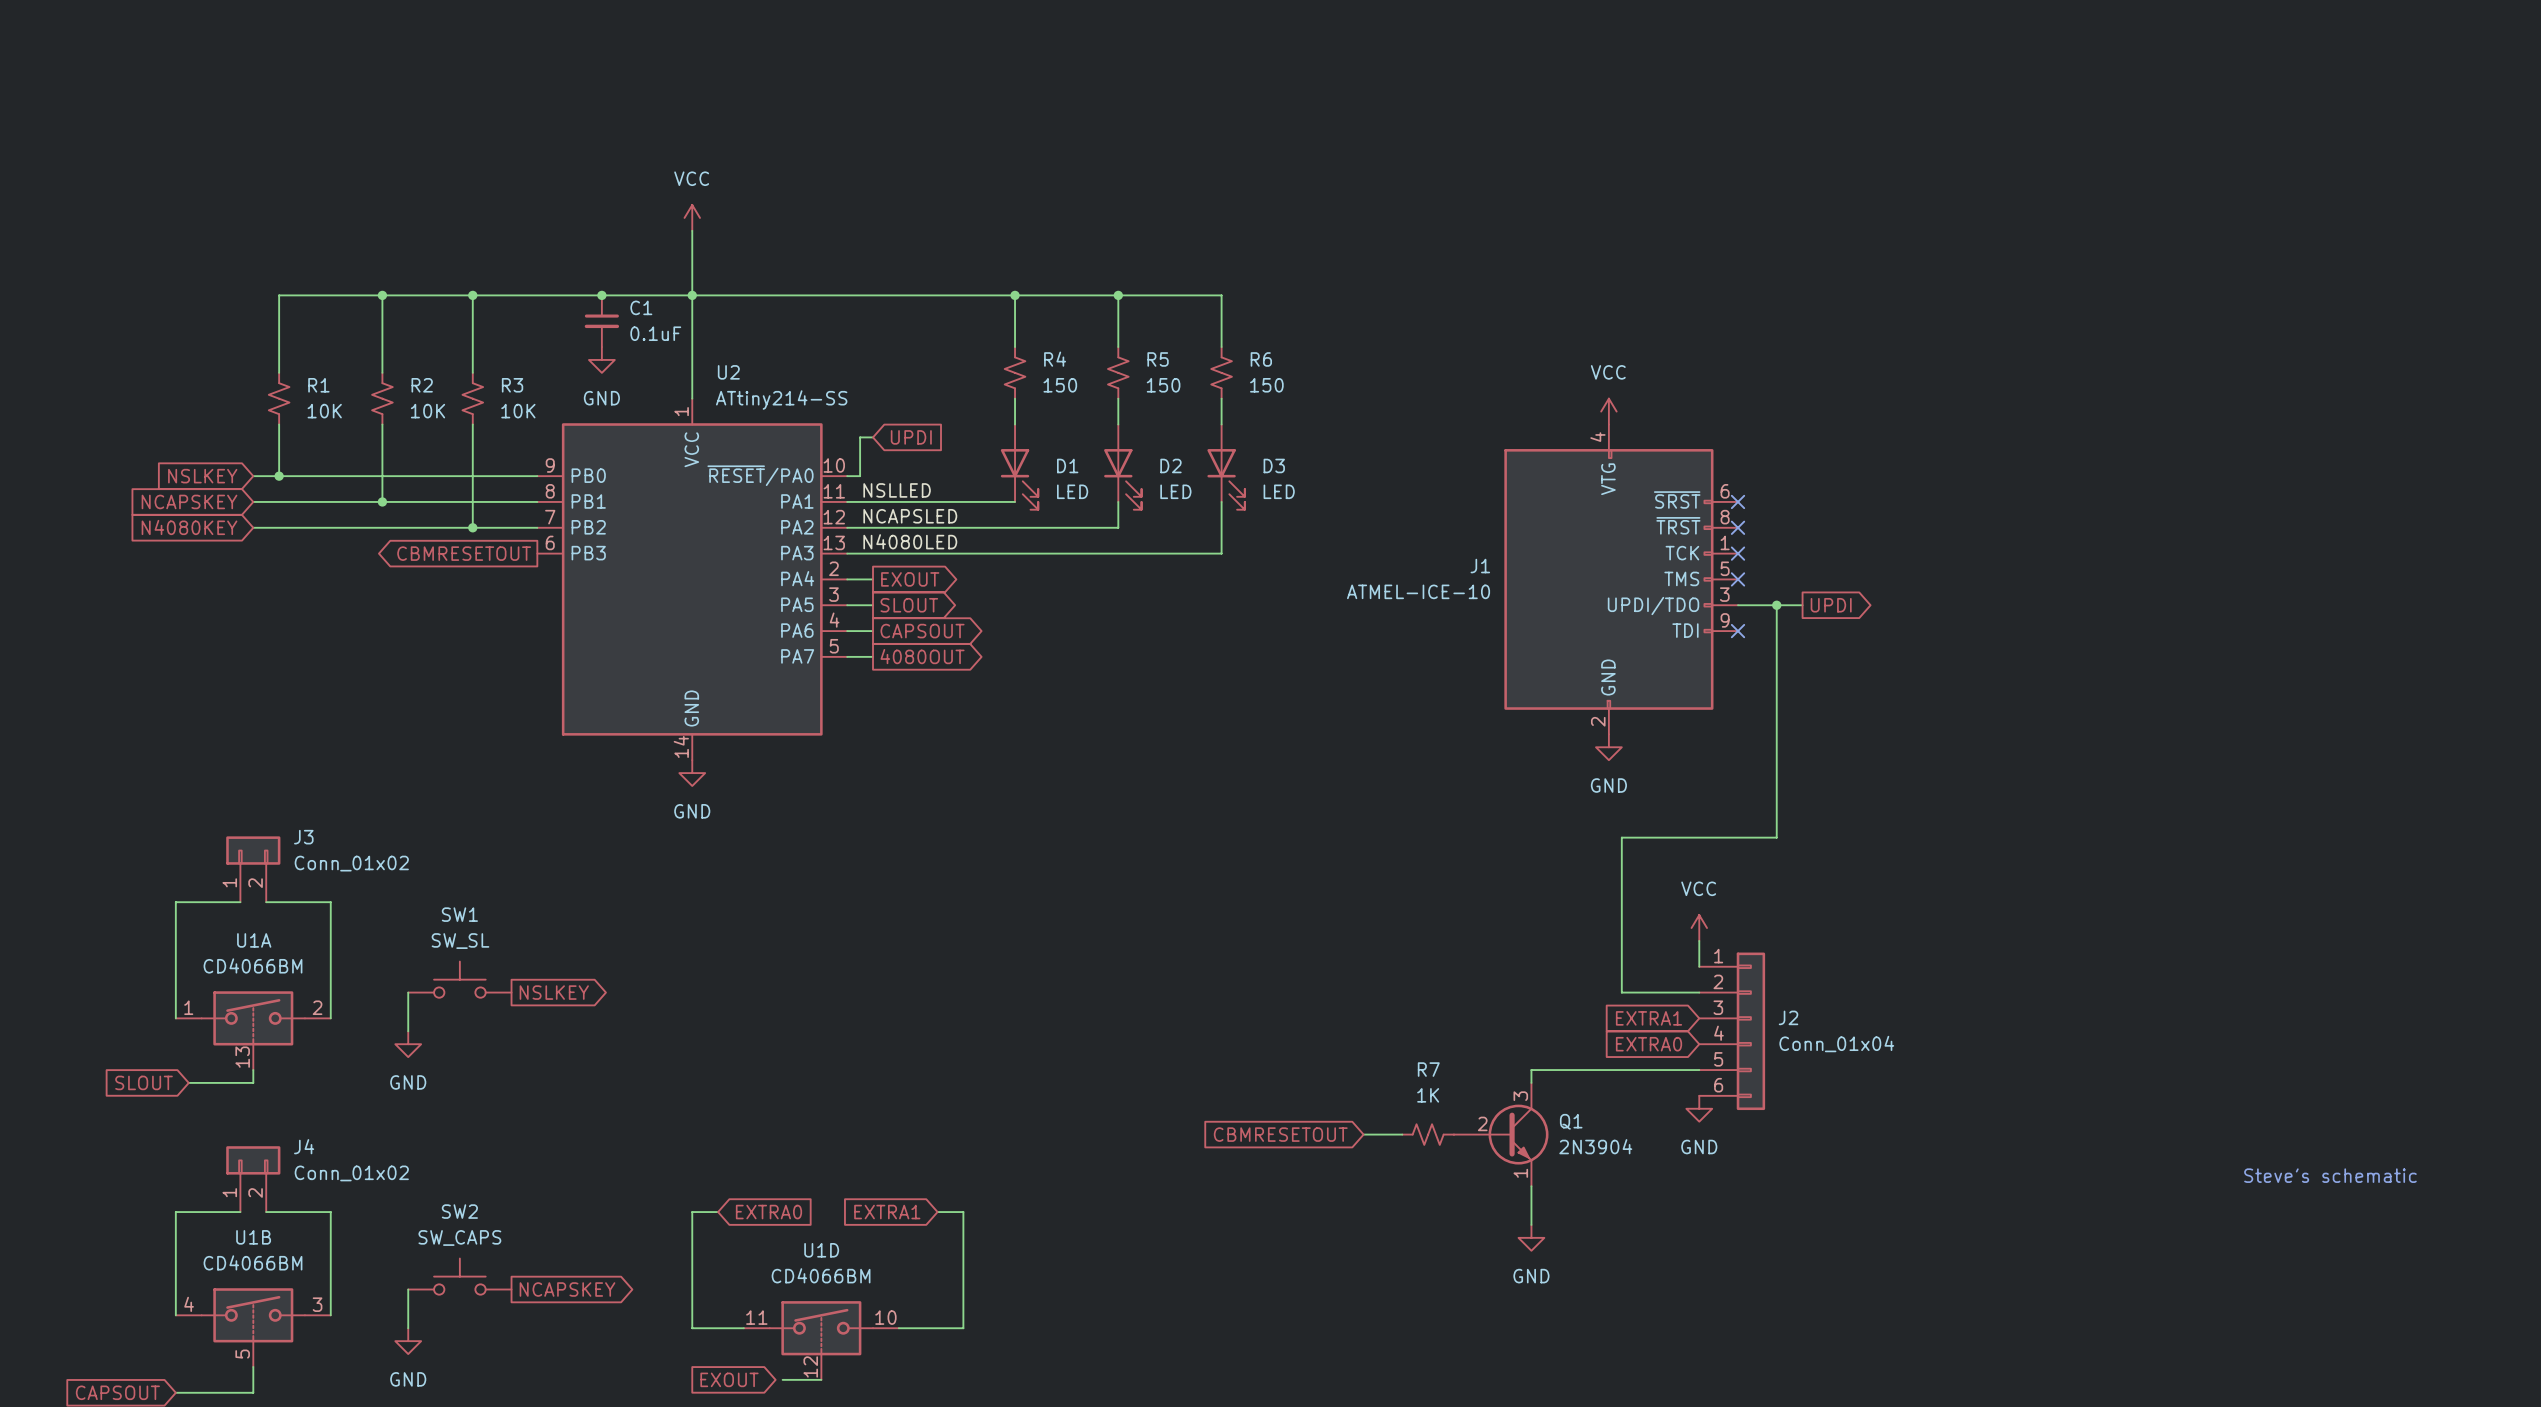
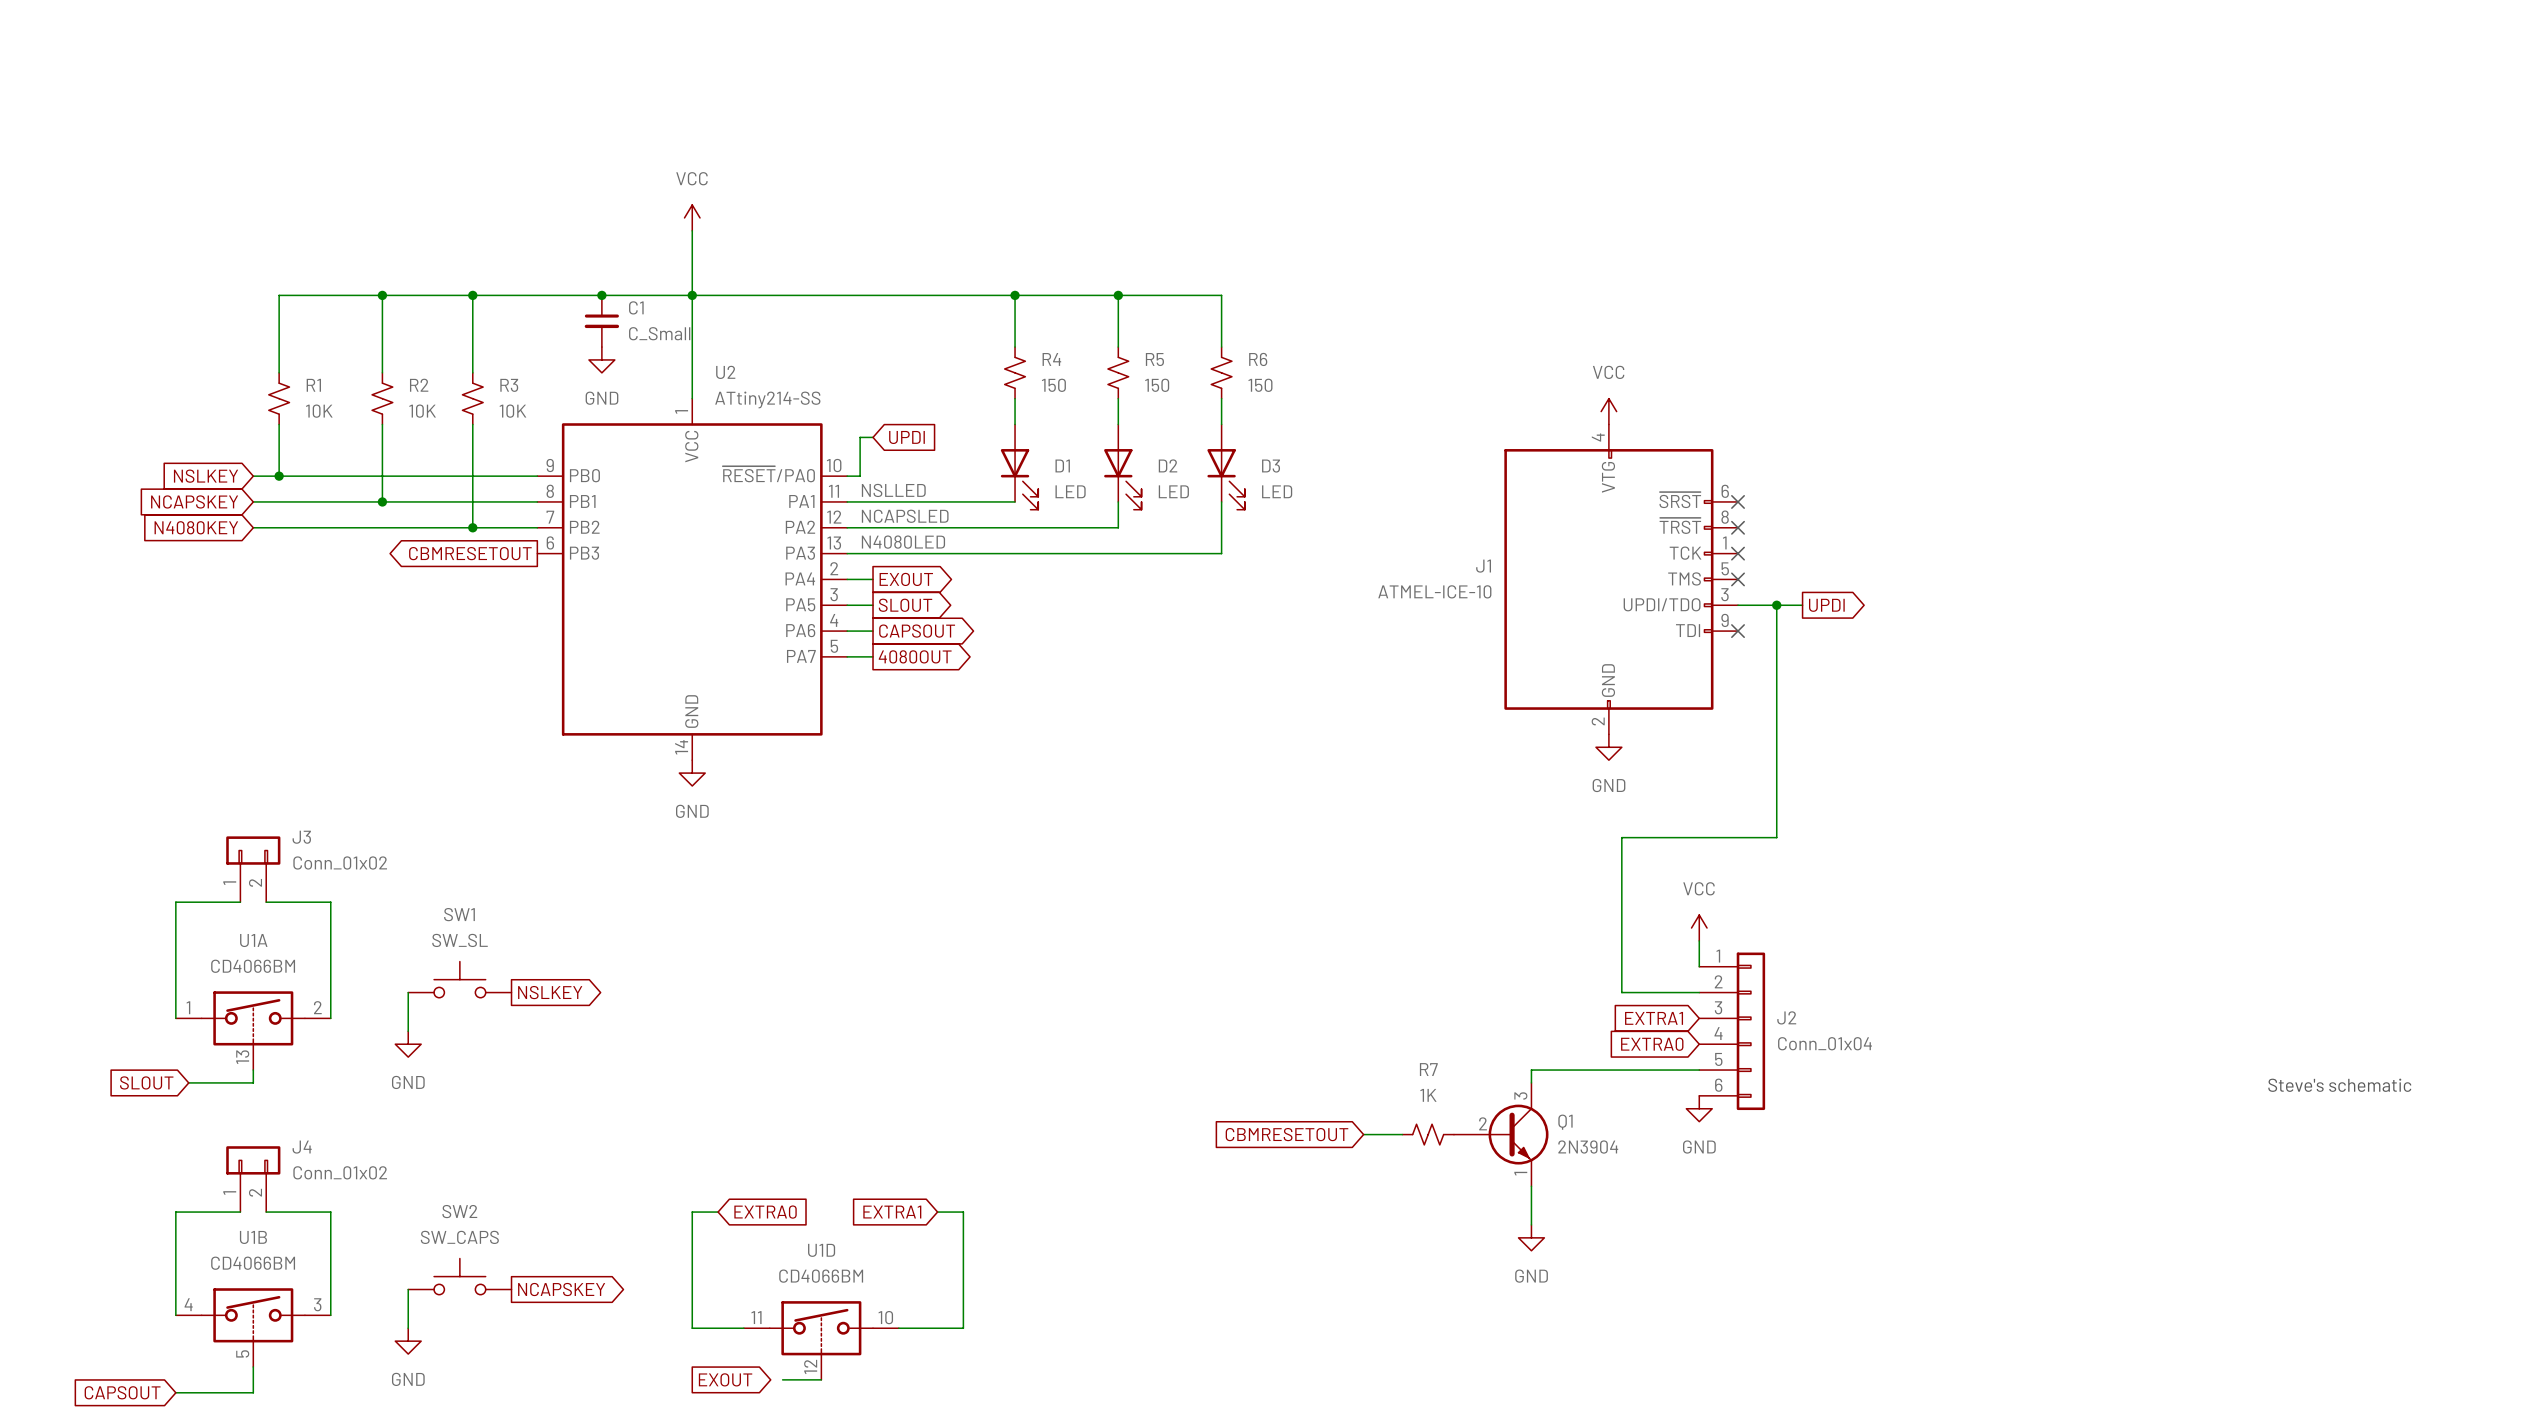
C1 value: 0.1uF (655, 333) -> C_Small (659, 333)
text position: Steve's schematic (2330, 1175) -> Steve's schematic (2339, 1085)

